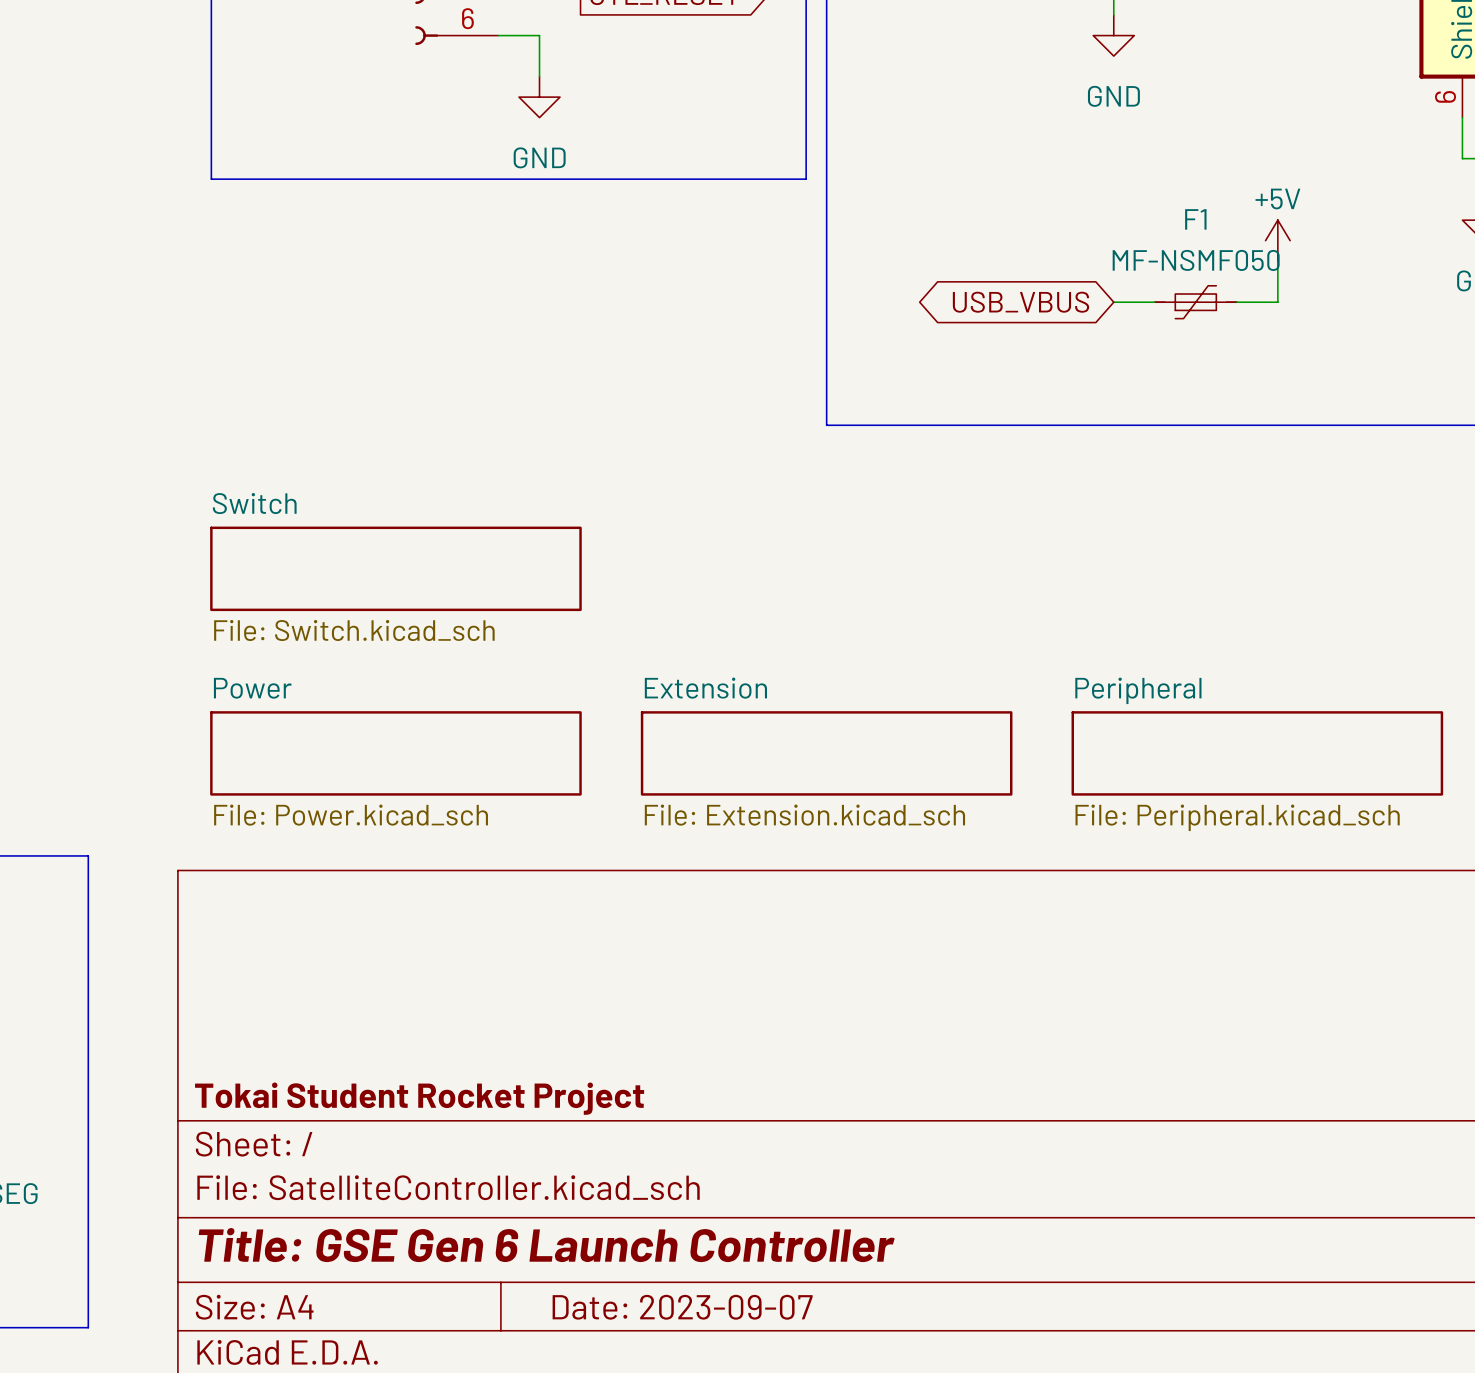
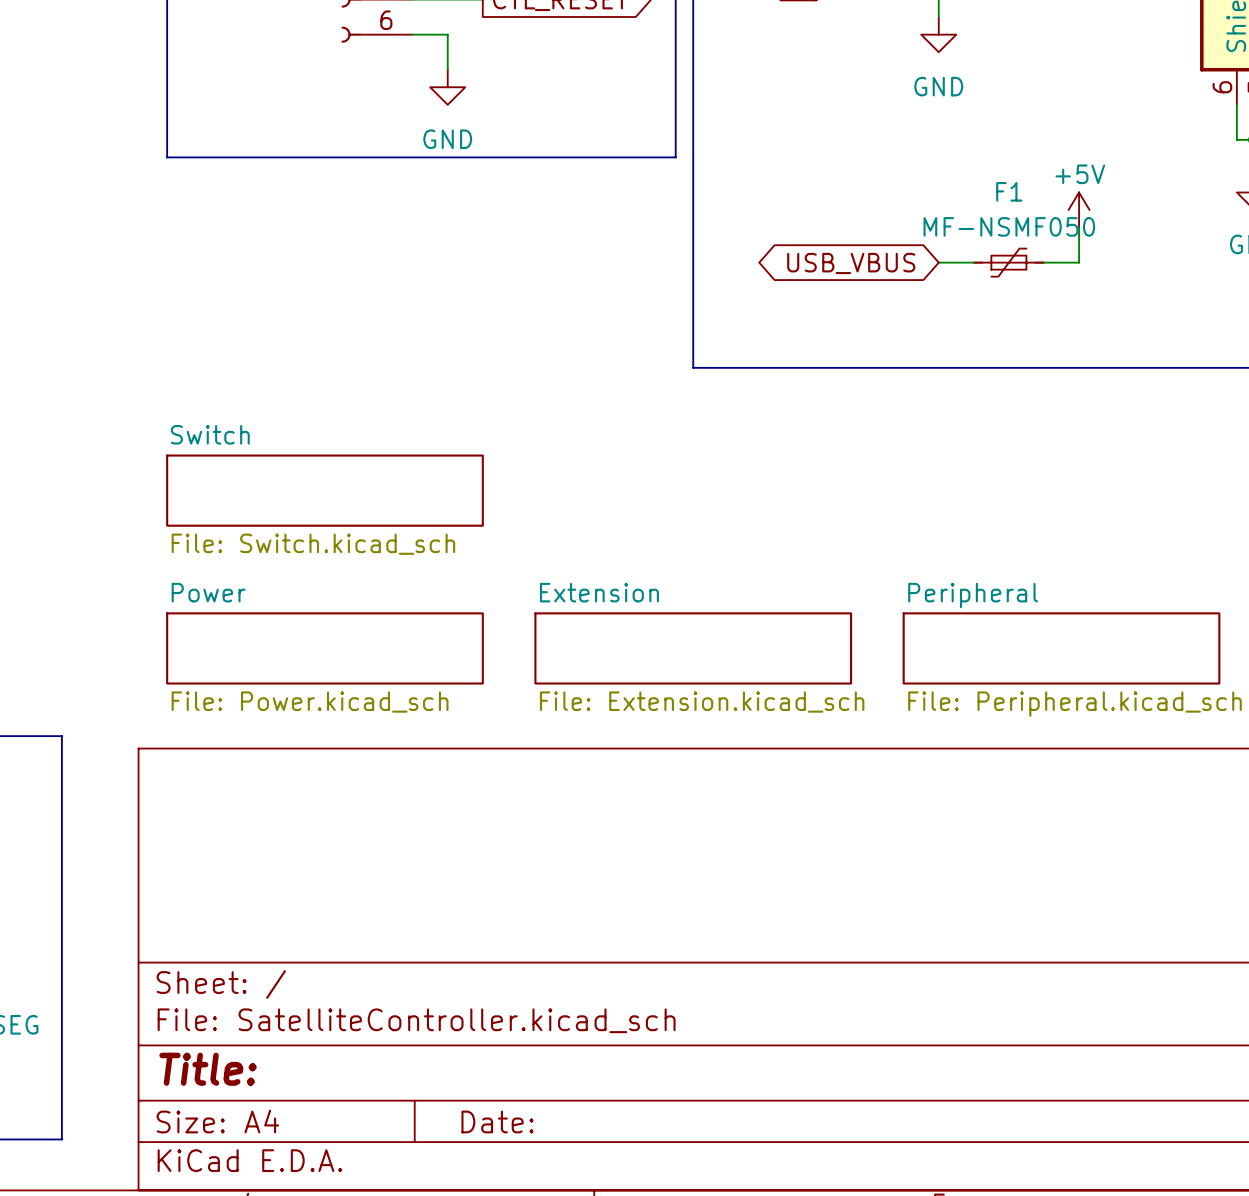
title block: Tokai Student Rocket Project (419, 1098) -> none
title block: Title: GSE Gen 6 Launch Controller (546, 1245) -> Title: (208, 1069)
title block: Date: 2023-09-07 (682, 1307) -> Date: (497, 1121)

